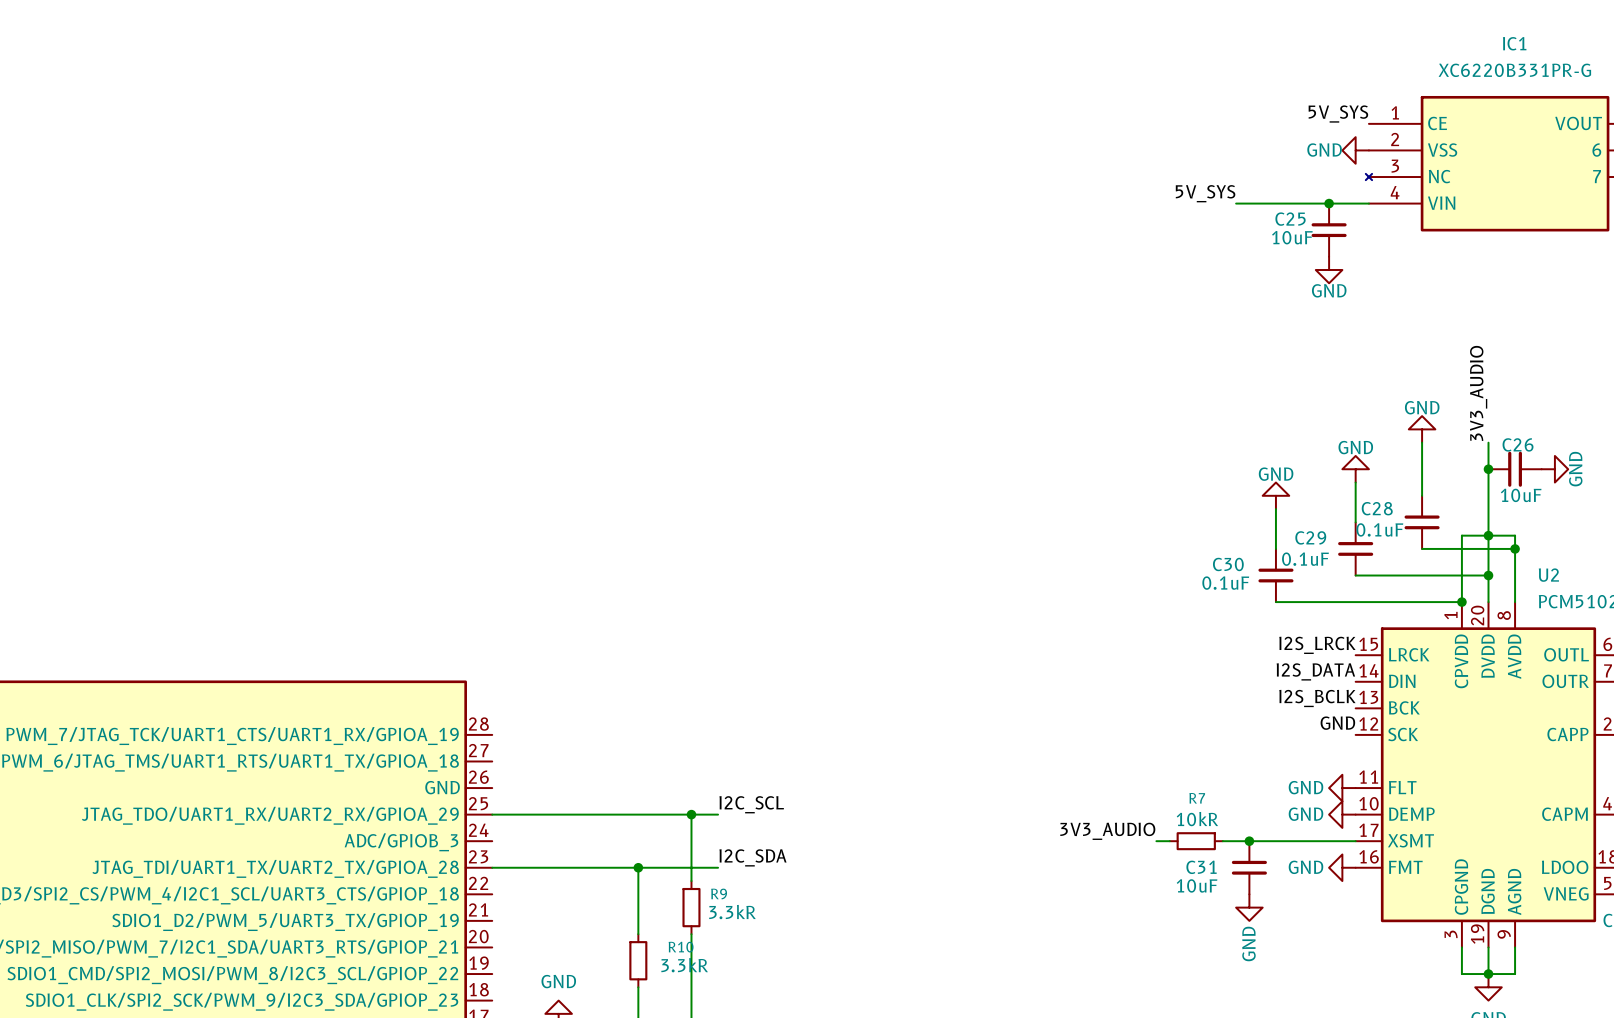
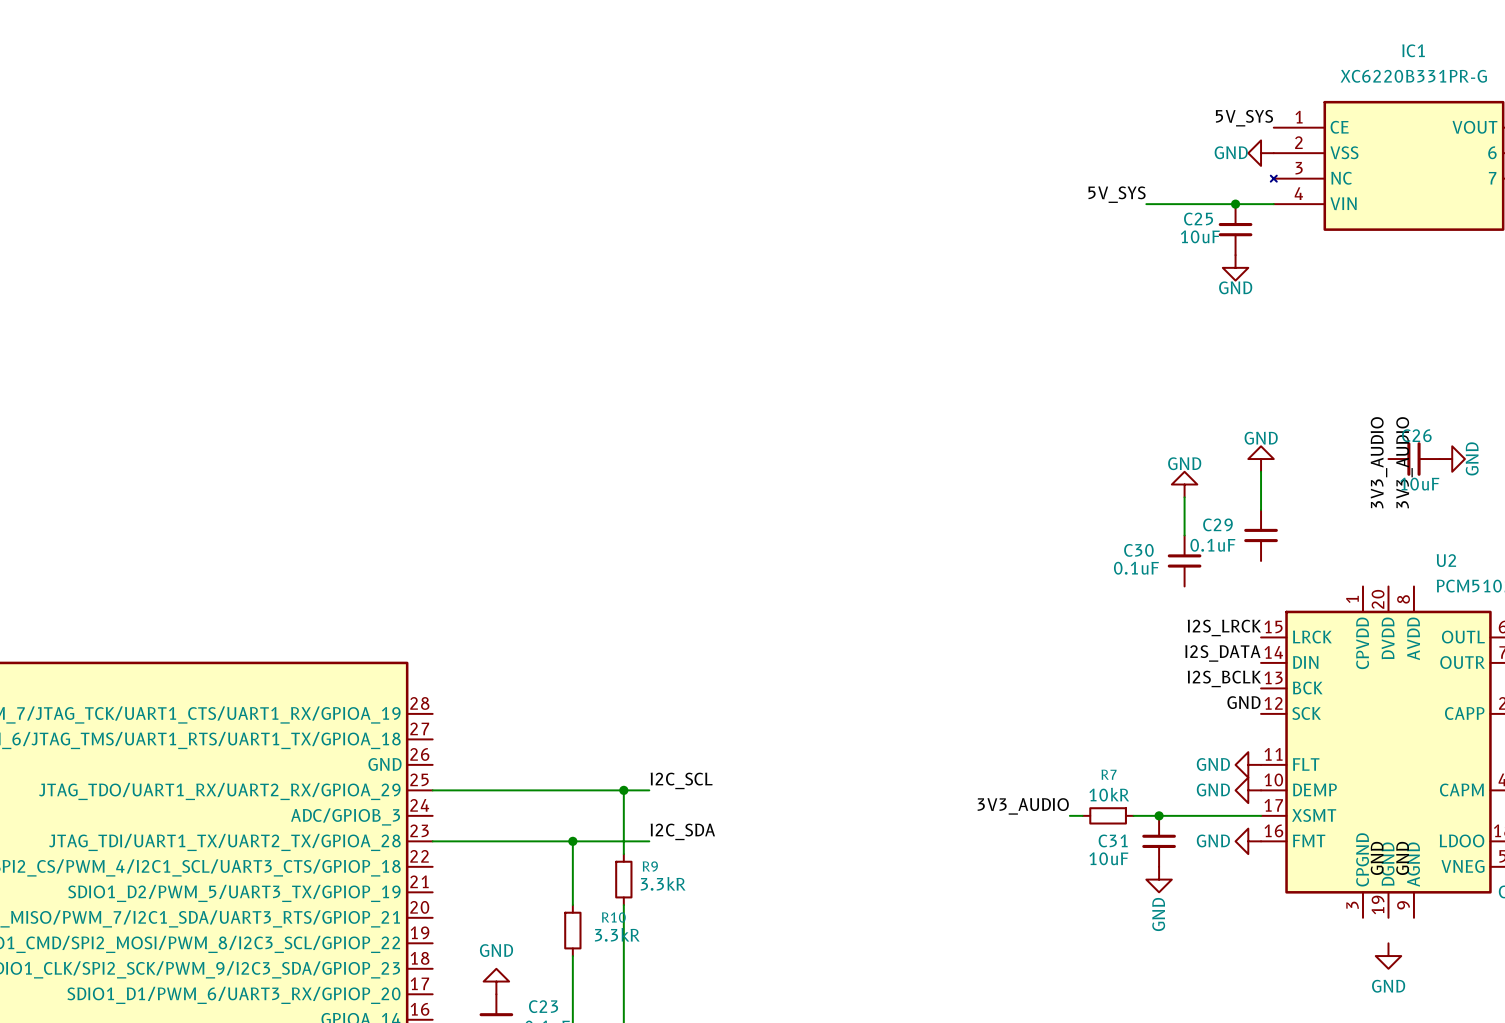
label: 3V3_AUDIO (1478, 393) -> none
power symbol: GND (1422, 429) -> none
wire: (1422, 442) (1422, 495) -> none
wire: (1488, 442) (1488, 602) -> none
junction: (1488, 469) -> none
label: none -> 3V3_AUDIO (1379, 462)
label: none -> 3V3_AUDIO (1404, 462)
C28: 0.1uF (1422, 522) -> none
junction: (1488, 535) -> none
wire: (1422, 548) (1515, 548) -> none
junction: (1515, 548) -> none
wire: (1355, 575) (1488, 575) -> none
junction: (1488, 575) -> none
wire: (1275, 602) (1461, 602) (1461, 535) (1515, 535) (1515, 602) -> none
junction: (1461, 602) -> none
label: none -> GND (1377, 858)
label: none -> GND (1402, 858)
wire: (1461, 947) (1461, 974) (1515, 974) (1515, 947) -> none
wire: (1488, 947) (1488, 974) -> none
junction: (1488, 974) -> none

